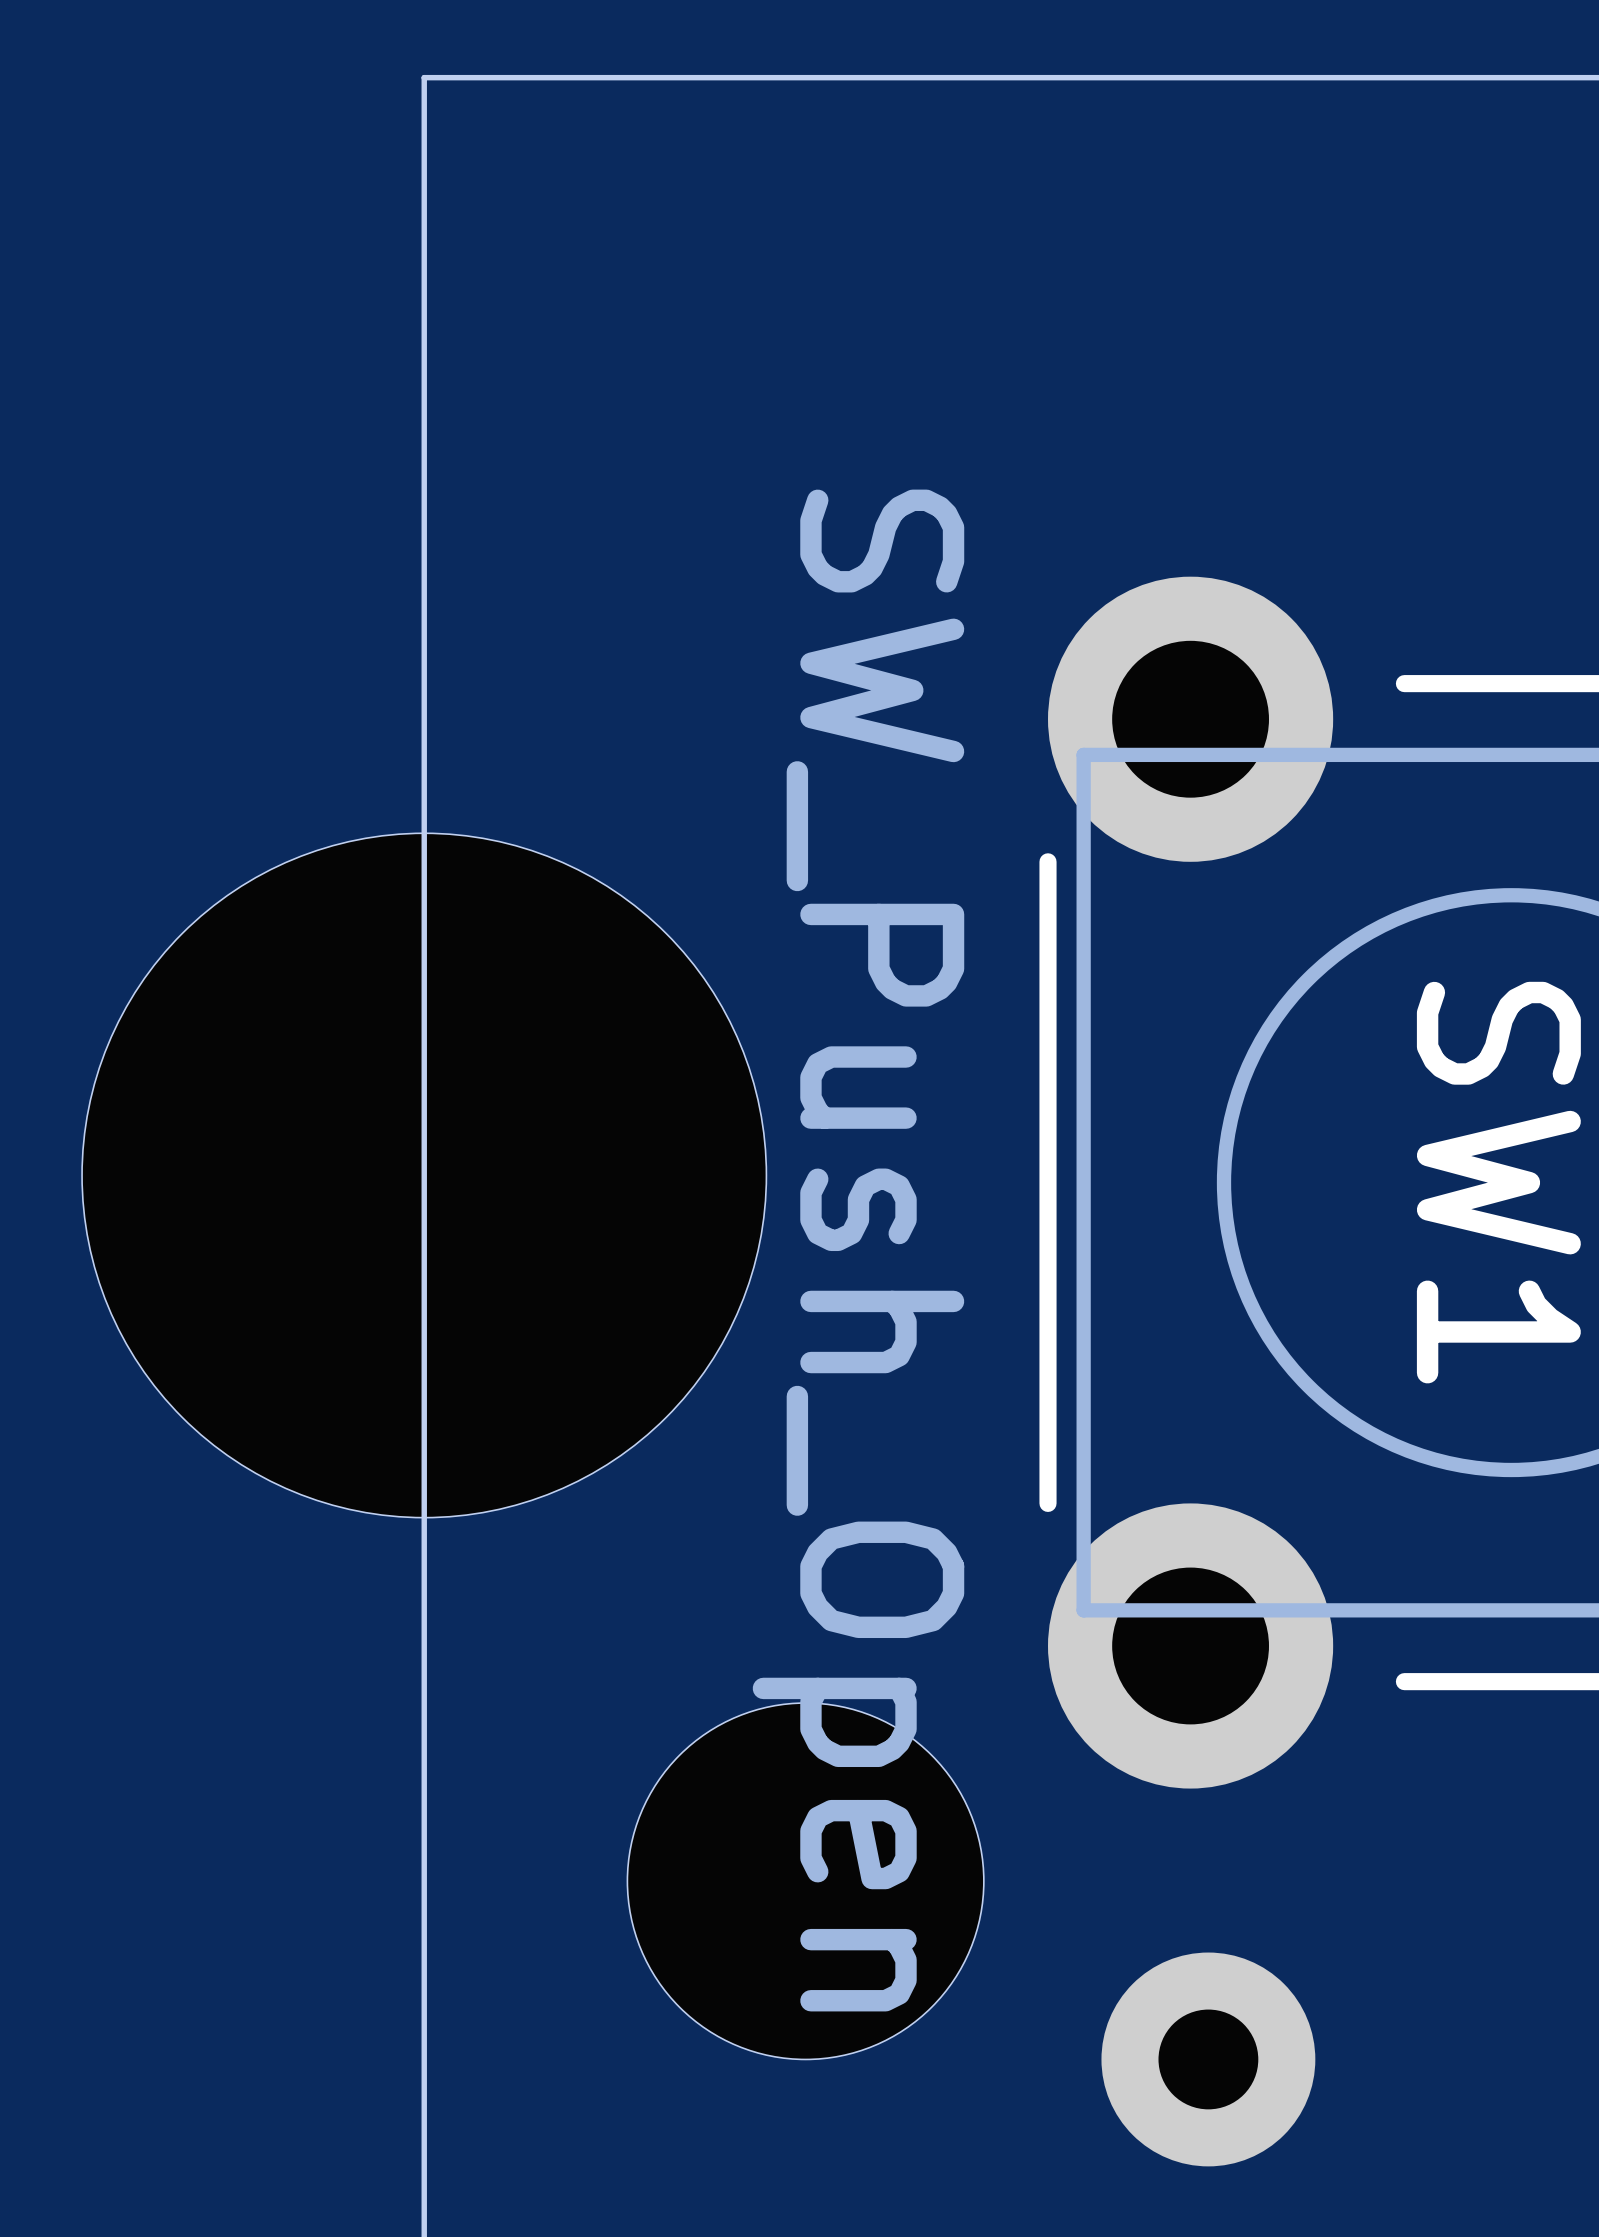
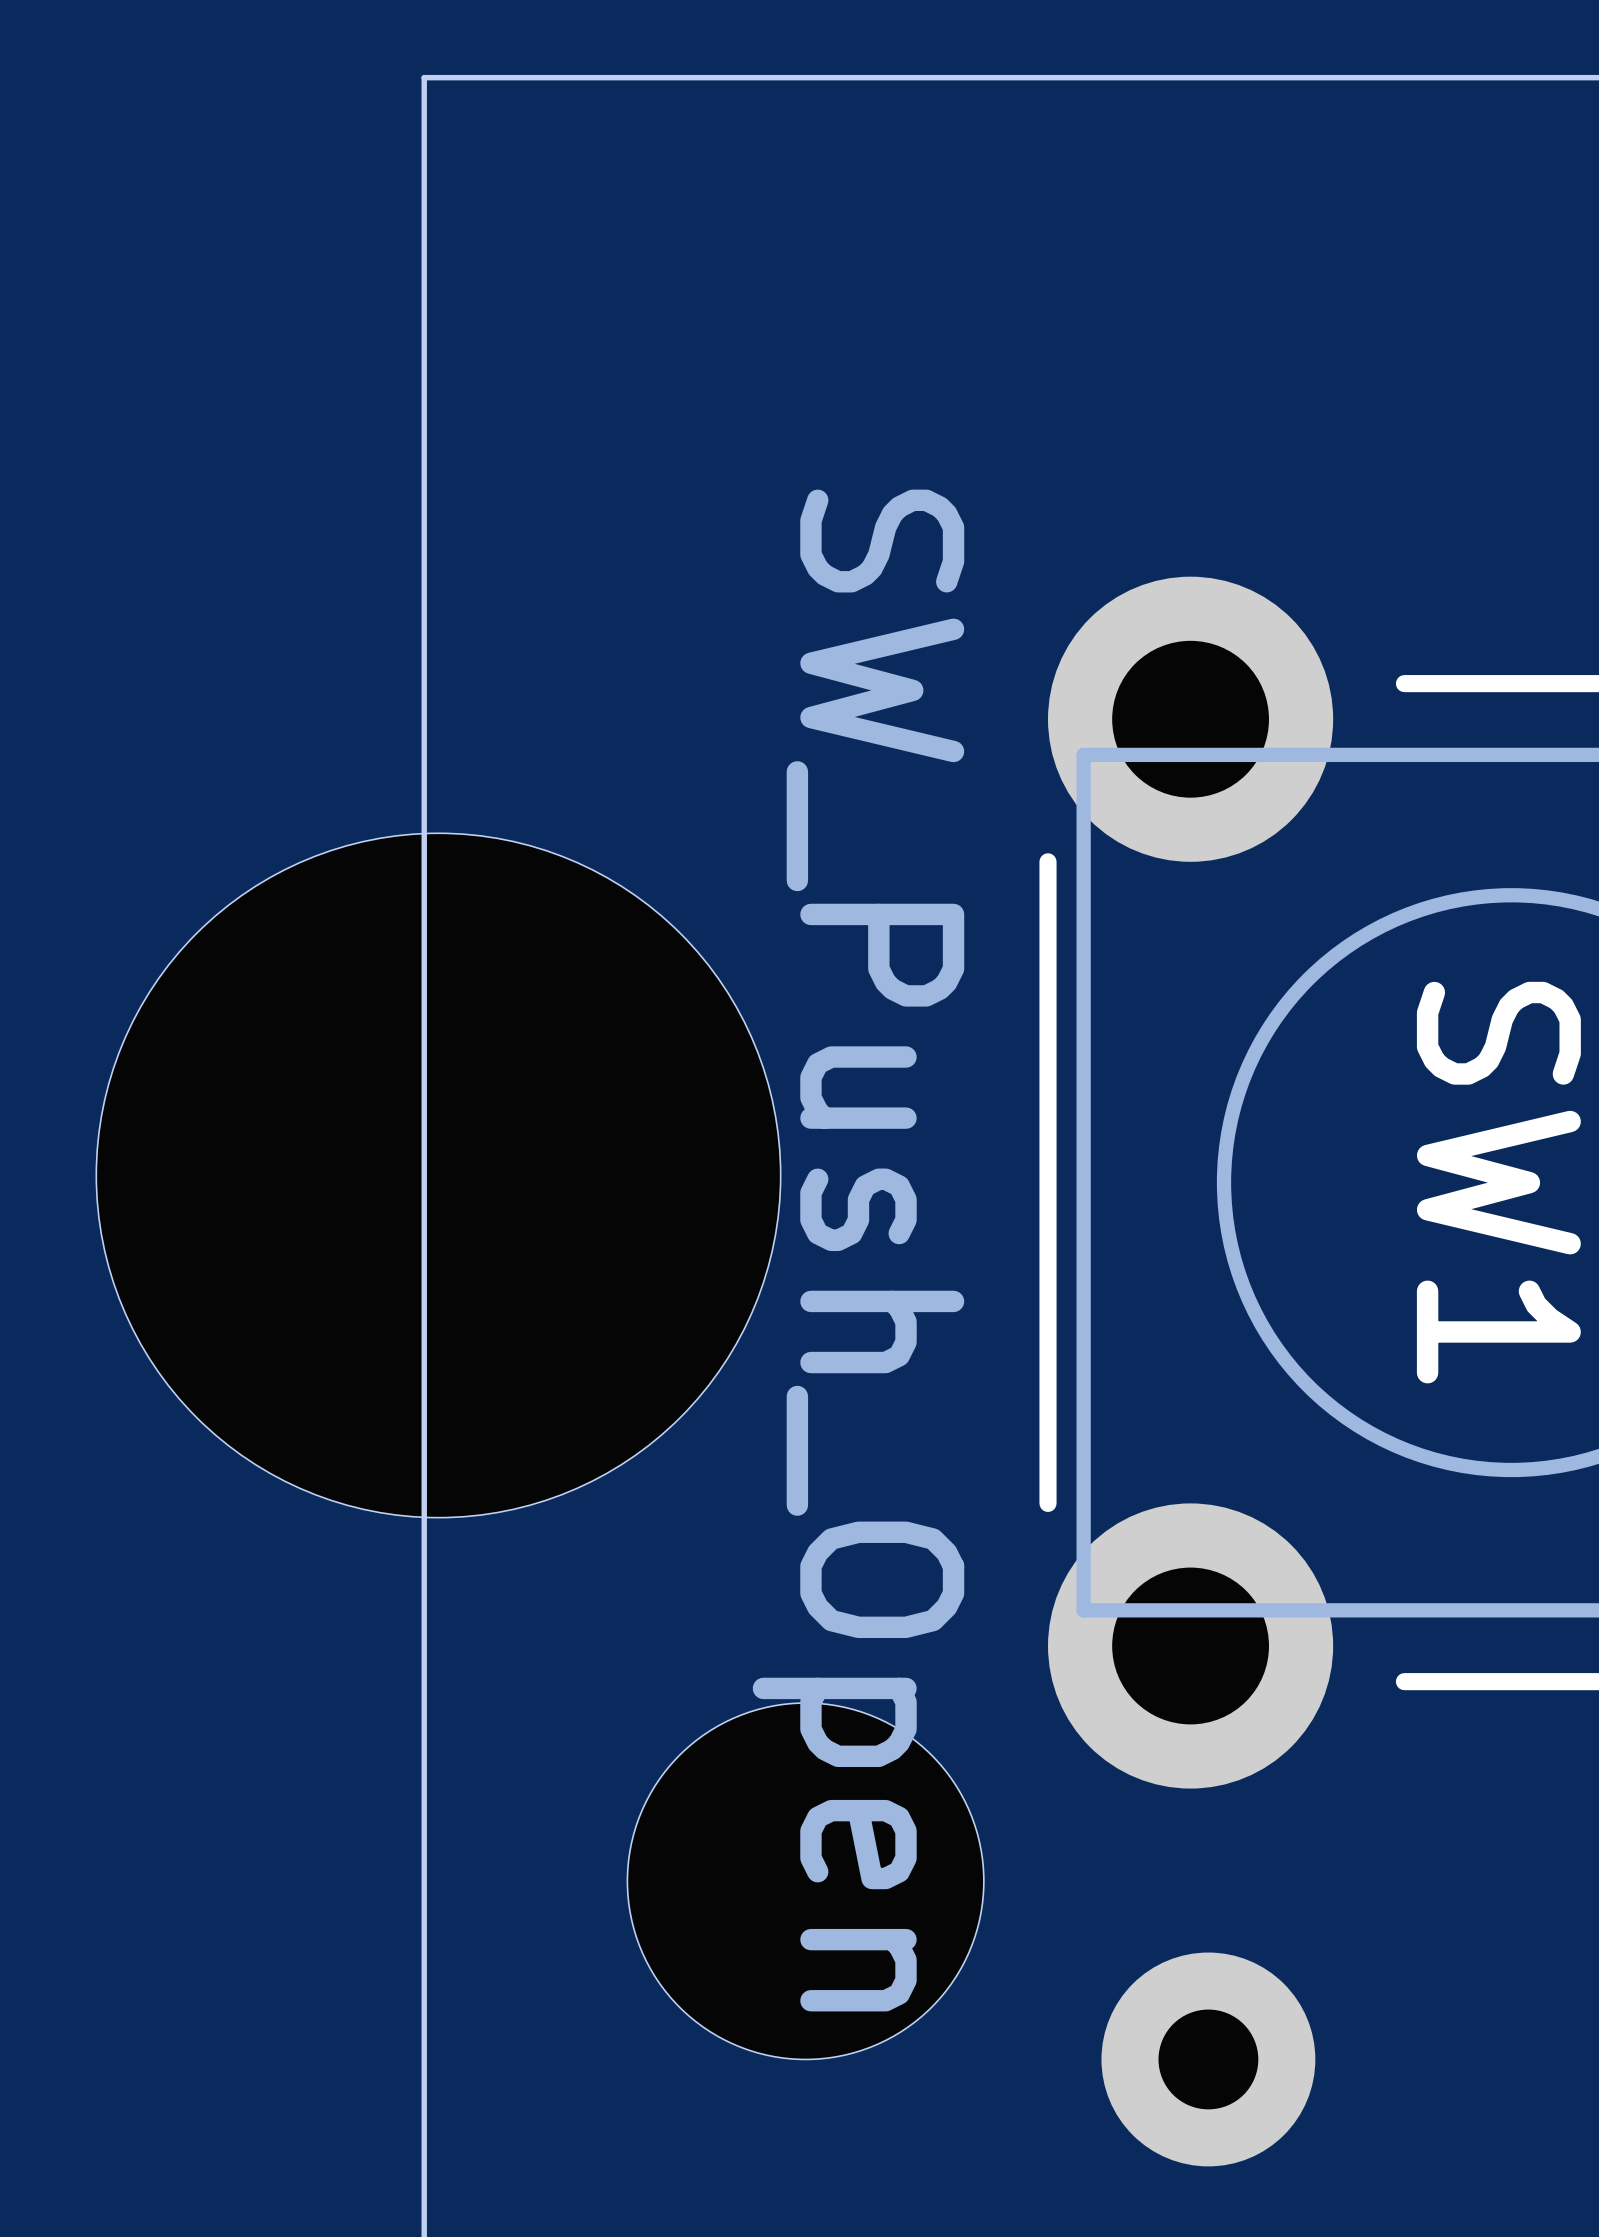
part position: (424, 1175) -> (438, 1175)

